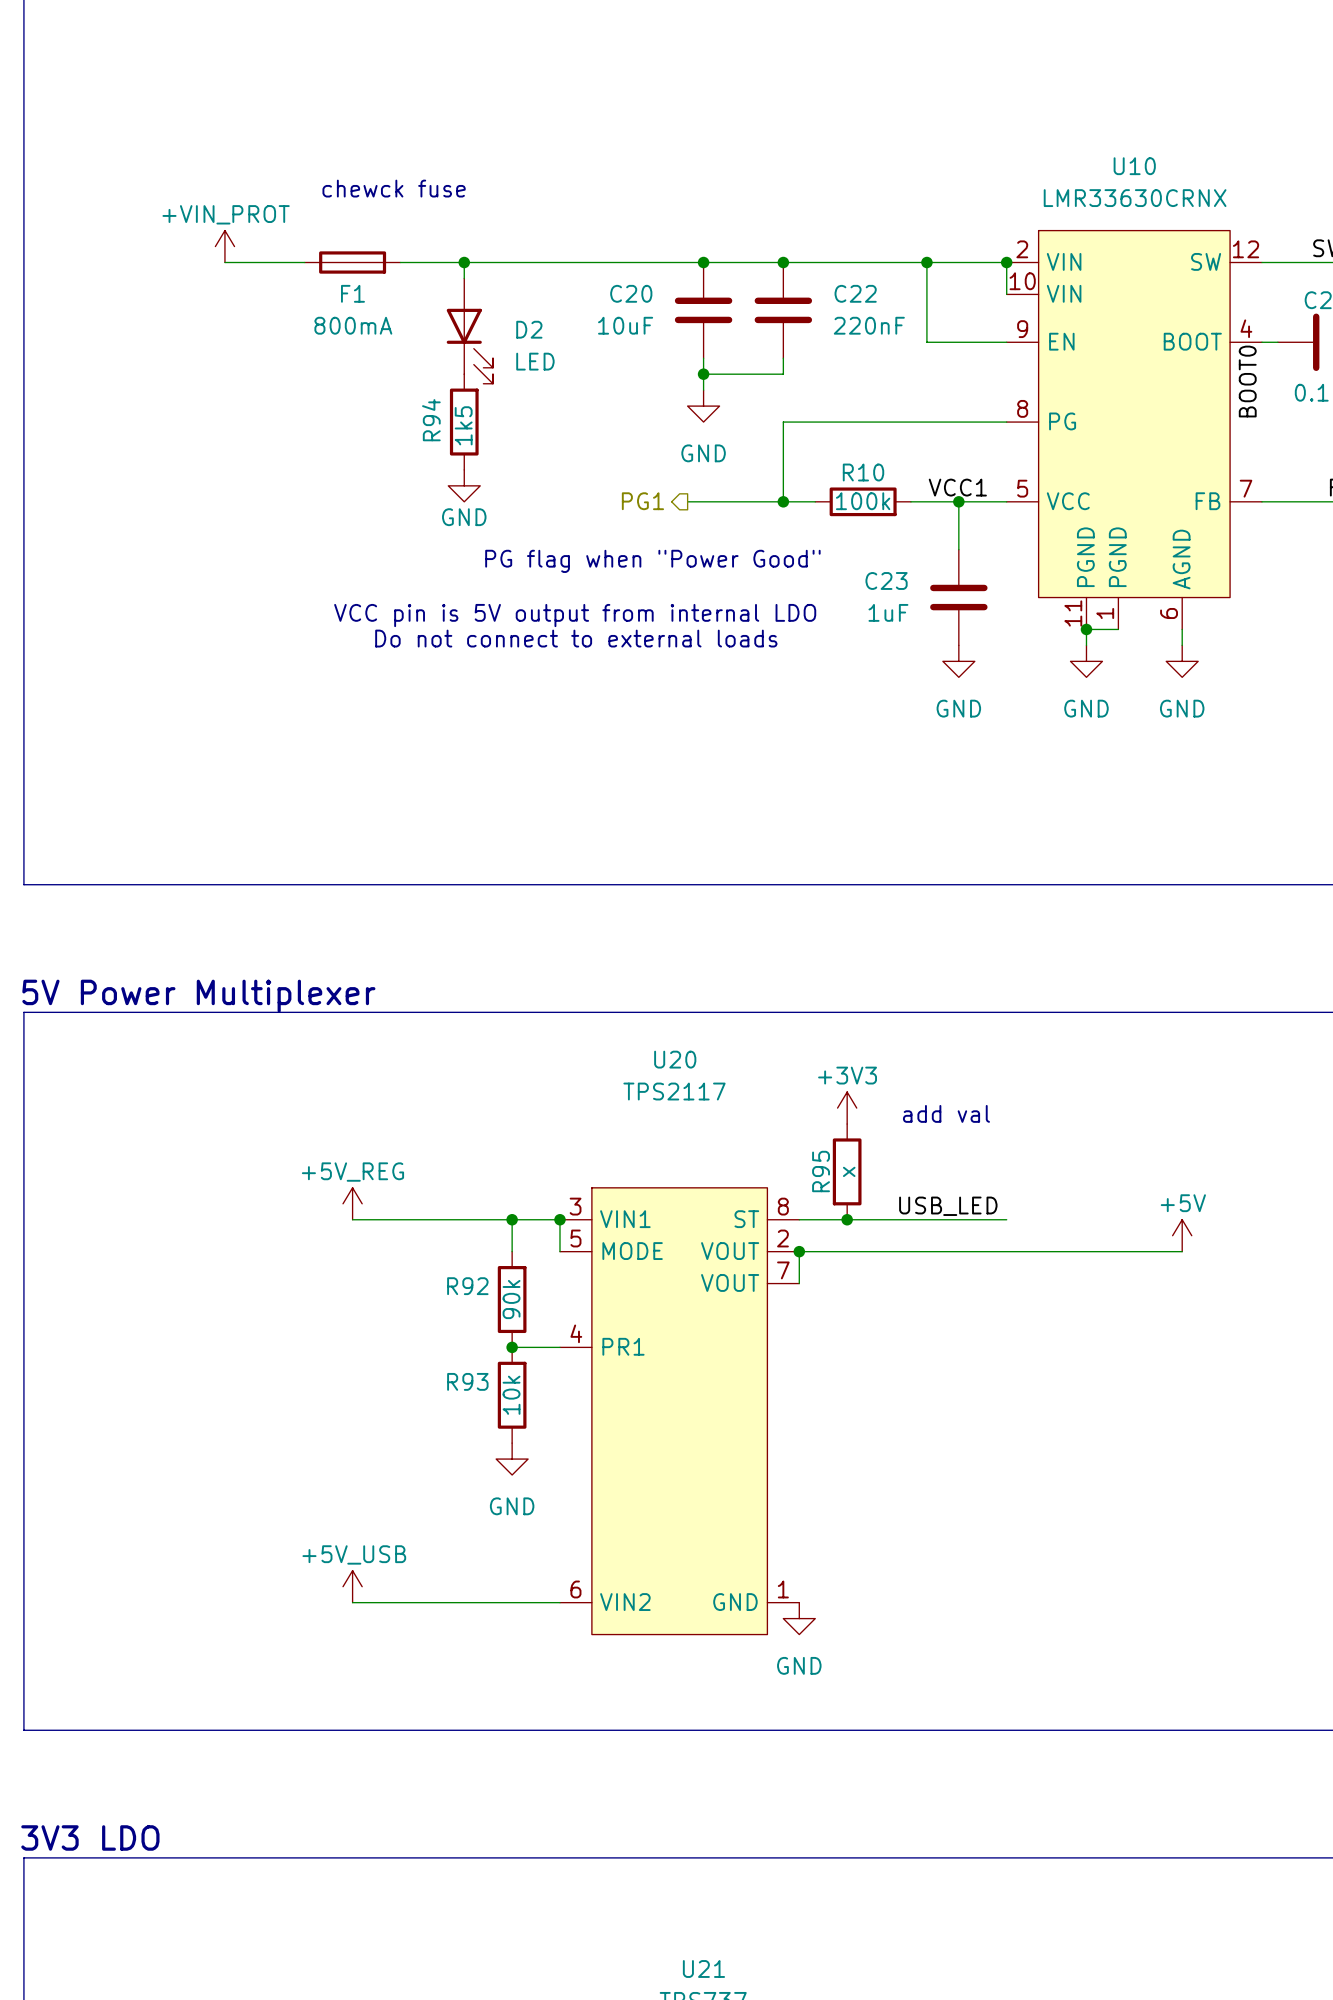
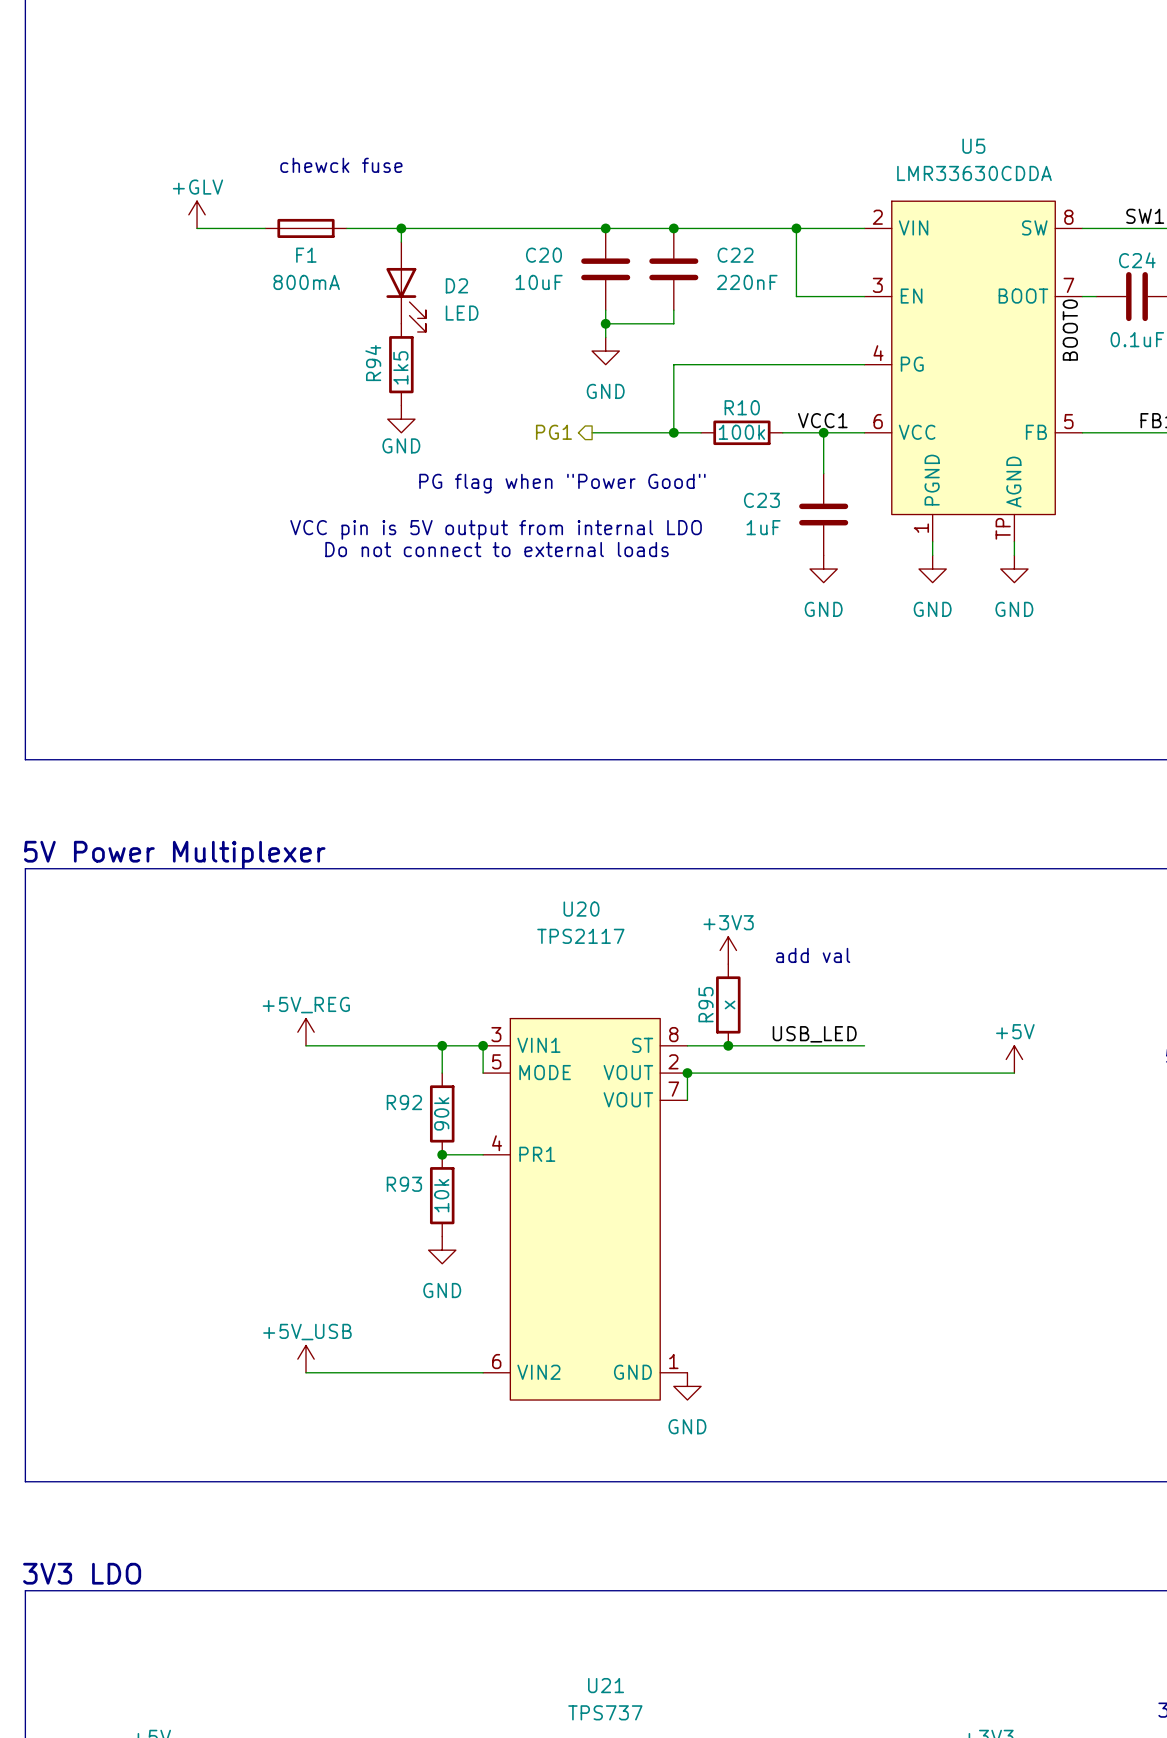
power symbol: +VIN_PROT (224, 246) -> +GLV (197, 214)
wire: (1006, 262) (1006, 294) -> none
junction: (1006, 262) -> none
U10: LMR33630CRNX (1134, 430) -> none
U5: none -> LMR33630CDDA (973, 371)
wire: (1086, 629) (1118, 629) -> none
junction: (1086, 629) -> none

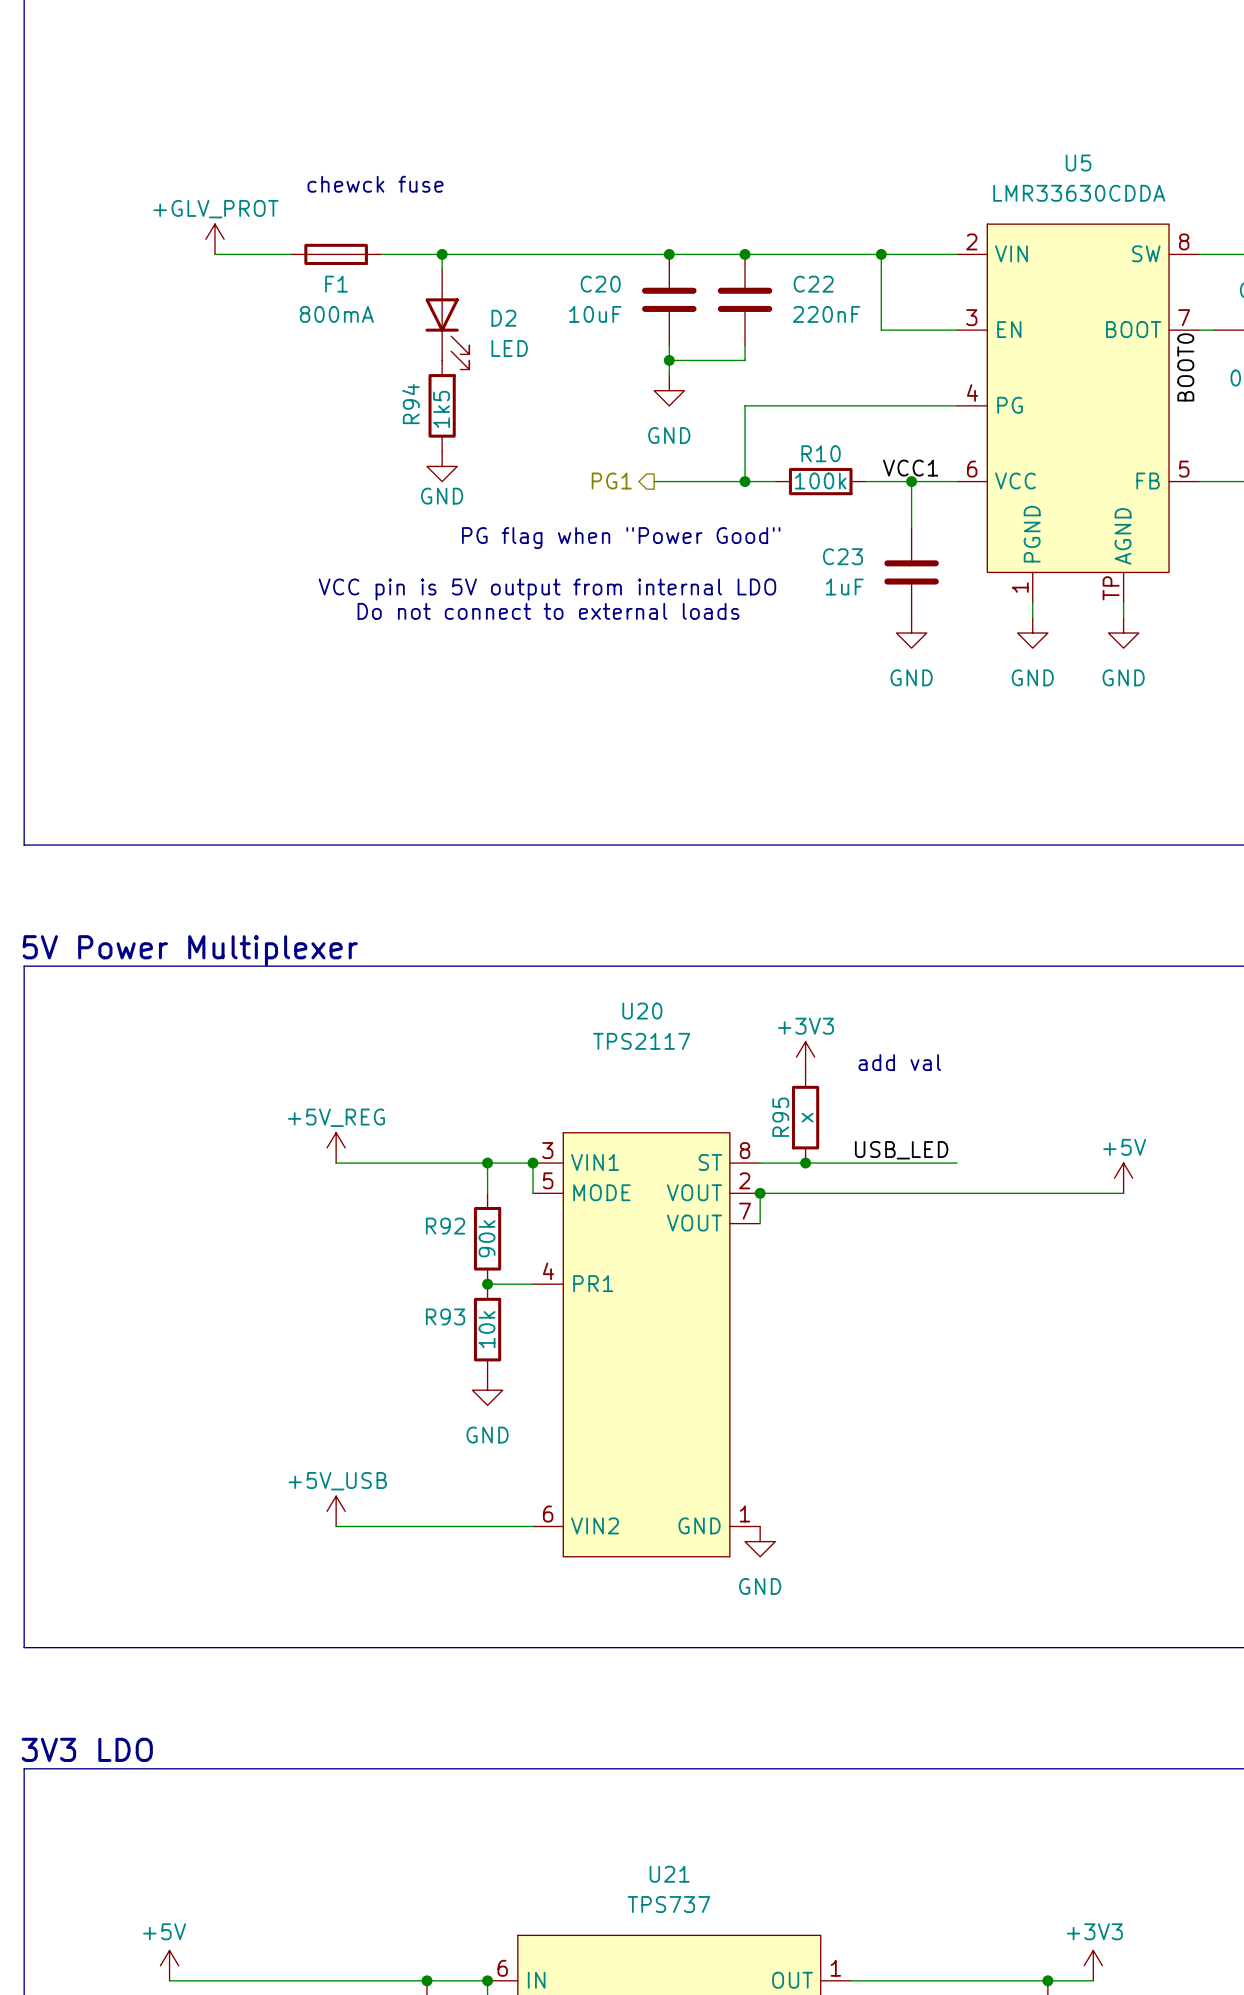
power symbol: +GLV (197, 214) -> +GLV_PROT (214, 239)

